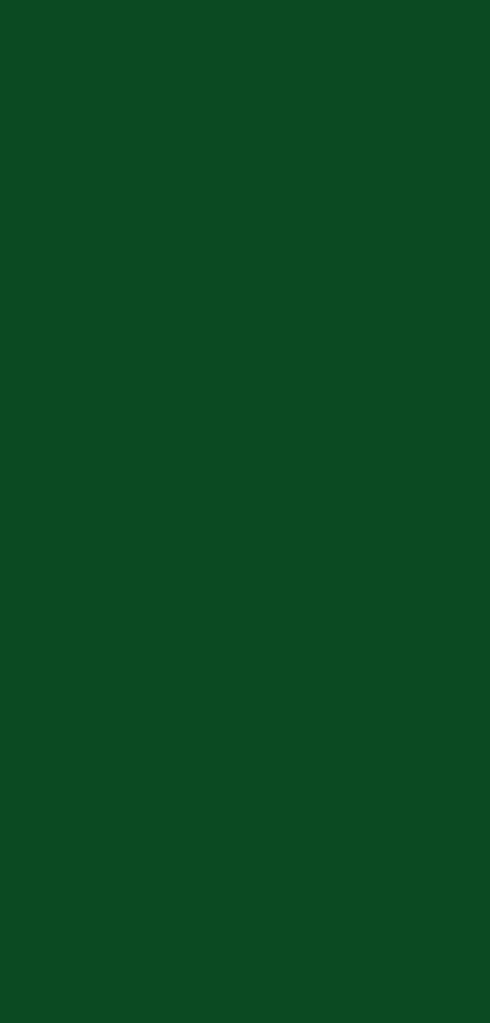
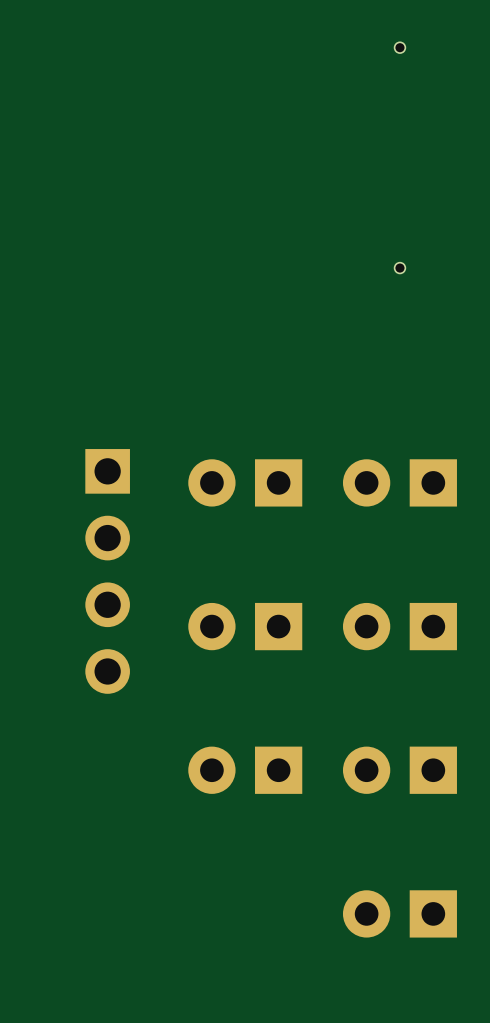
part: none -> (399, 47)
part: none -> (399, 268)
part: none -> (245, 482)
part: none -> (399, 482)
part: none -> (107, 571)
part: none -> (245, 626)
part: none -> (399, 626)
part: none -> (245, 770)
part: none -> (399, 770)
part: none -> (399, 913)

